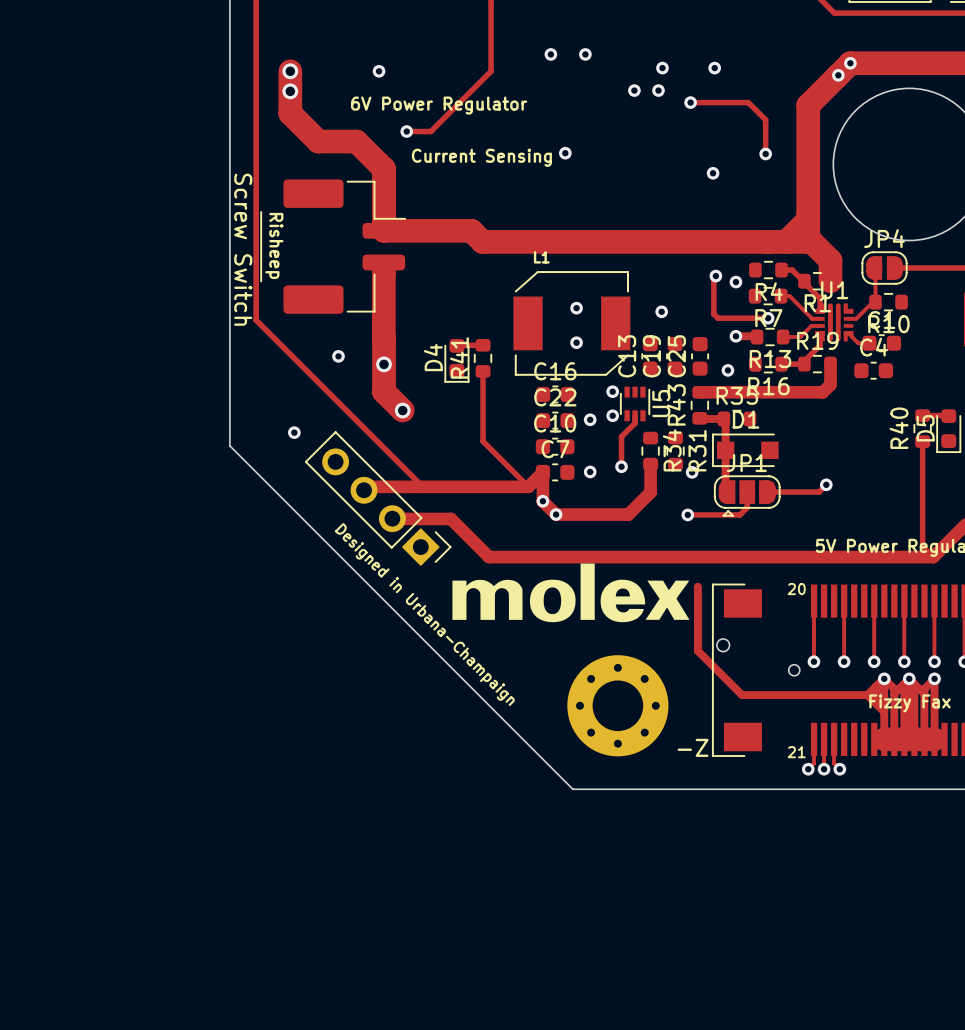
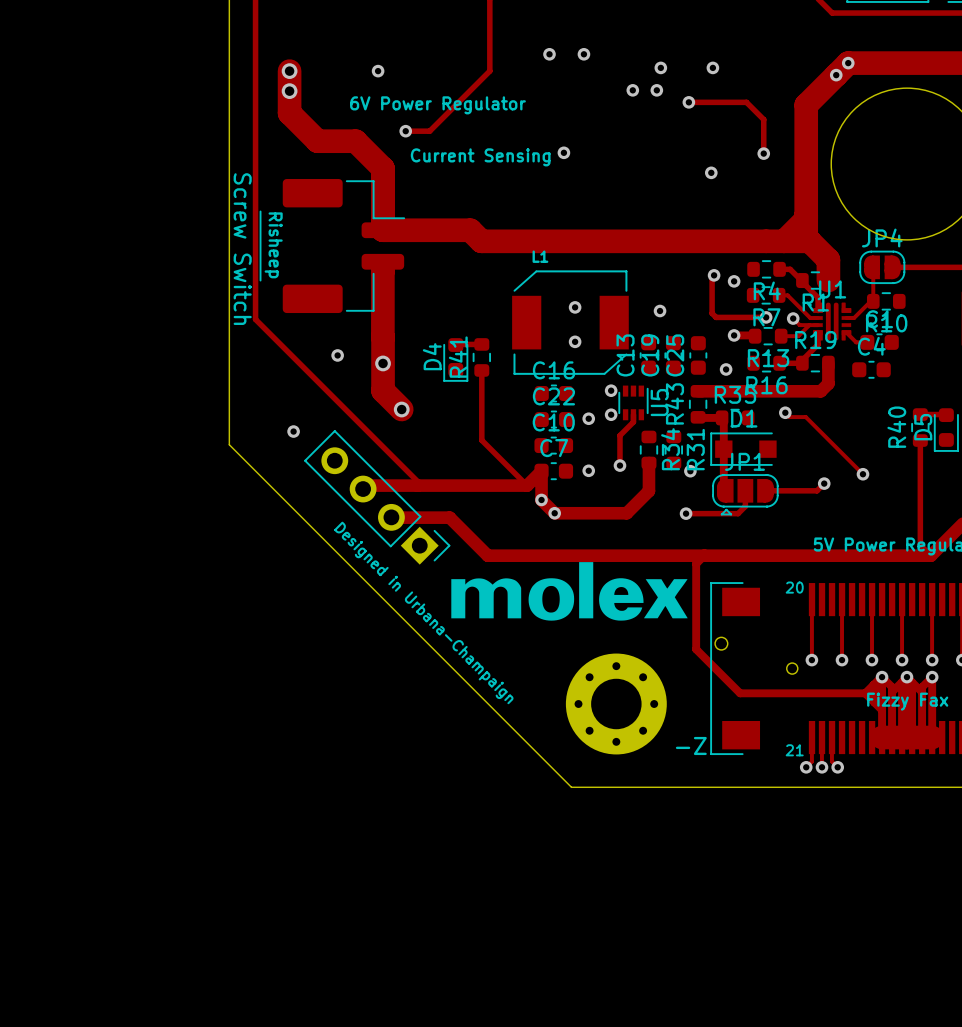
track: none -> (793, 318) (799, 325) (809, 325)
via: none -> (793, 318)
track: none -> (785, 412) (789, 417) (805, 417) (862, 474)
via: none -> (785, 412)
via: none -> (862, 474)
track: none -> (704, 555) (696, 563) (696, 585)

